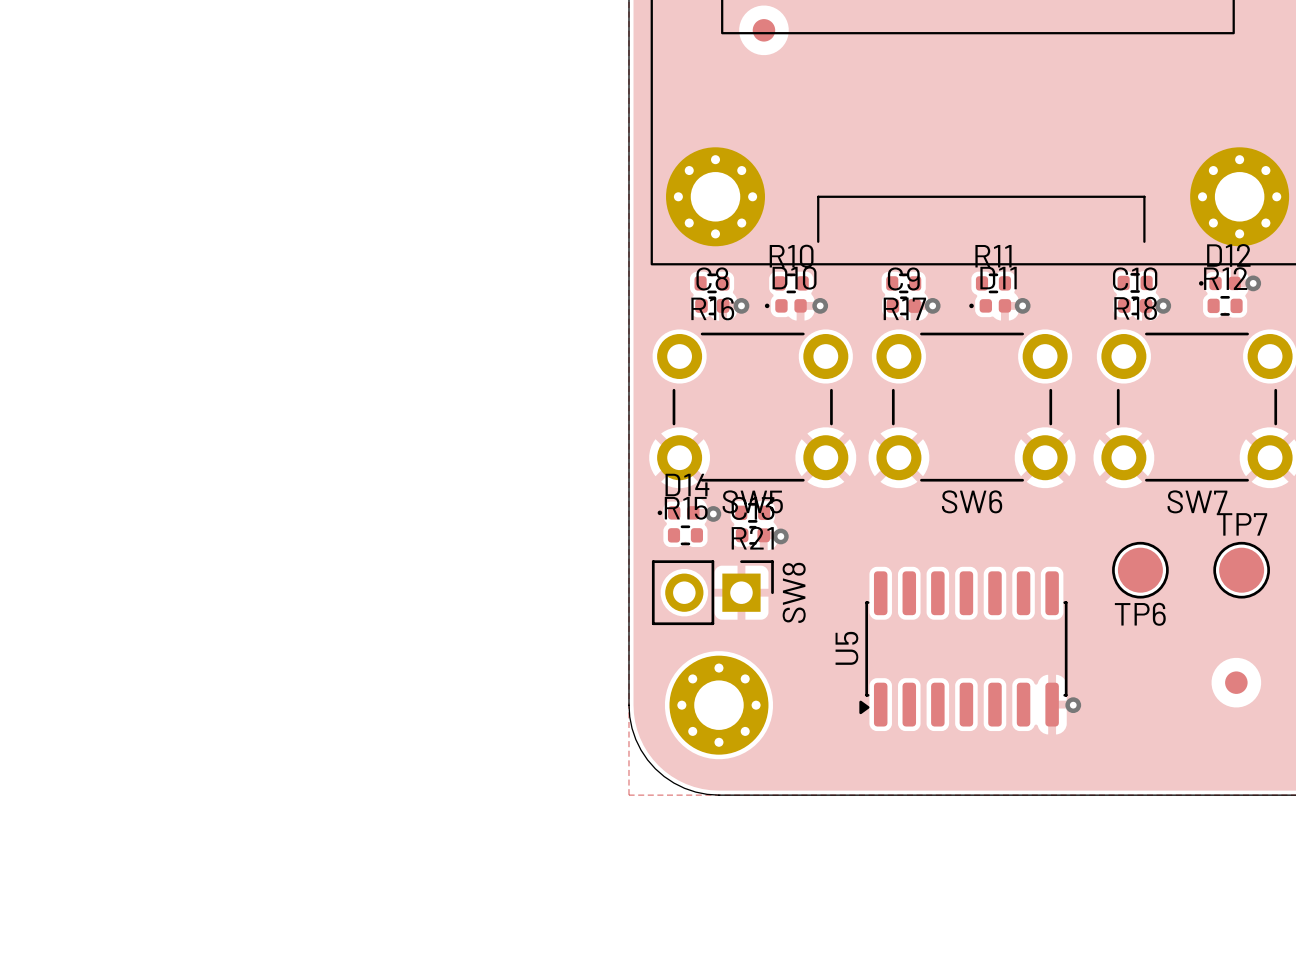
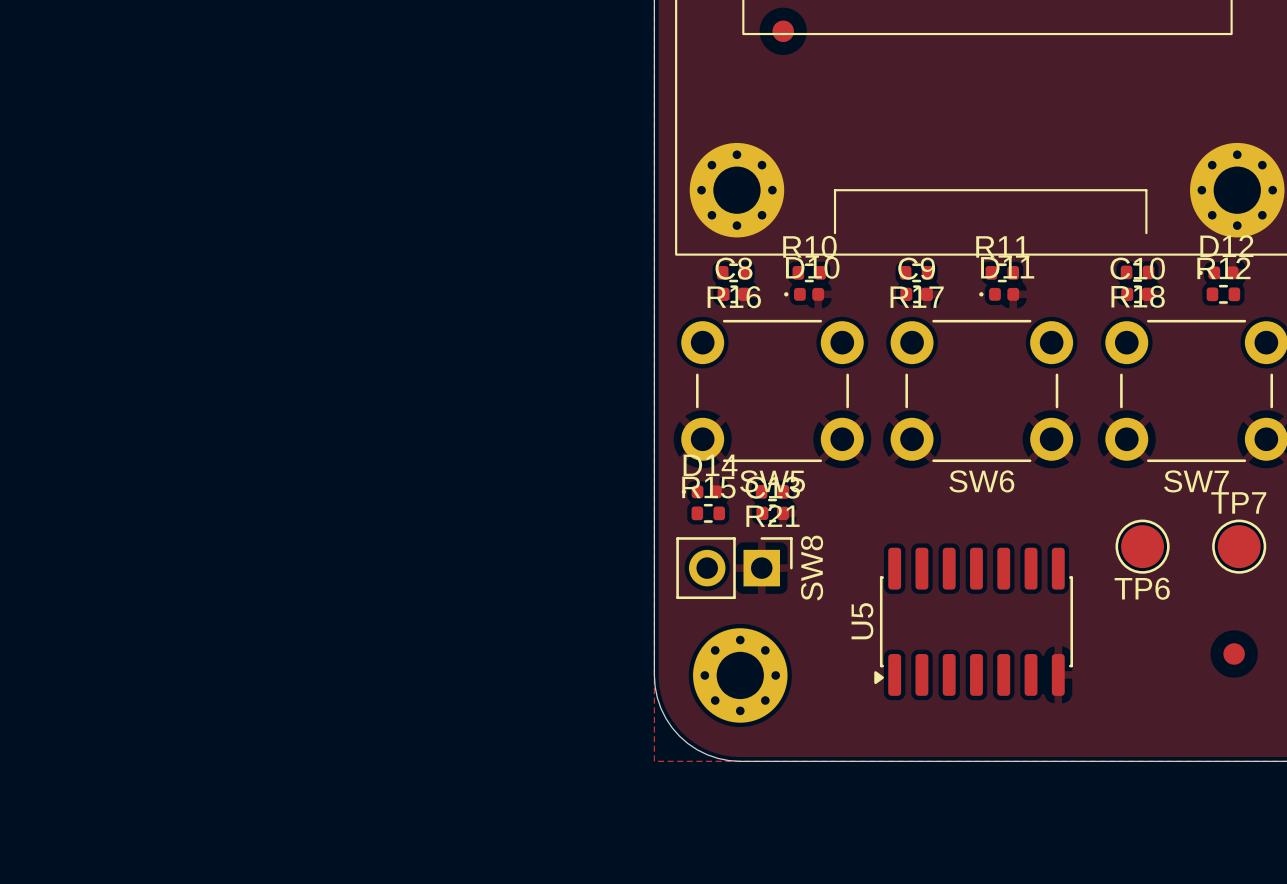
via: (1253, 283) -> none
via: (741, 305) -> none
via: (820, 305) -> none
via: (932, 305) -> none
via: (1022, 305) -> none
via: (1163, 305) -> none
via: (713, 513) -> none
via: (780, 536) -> none
via: (1073, 705) -> none

